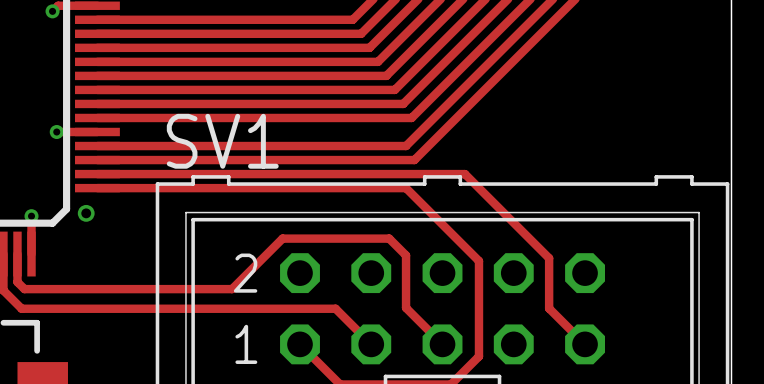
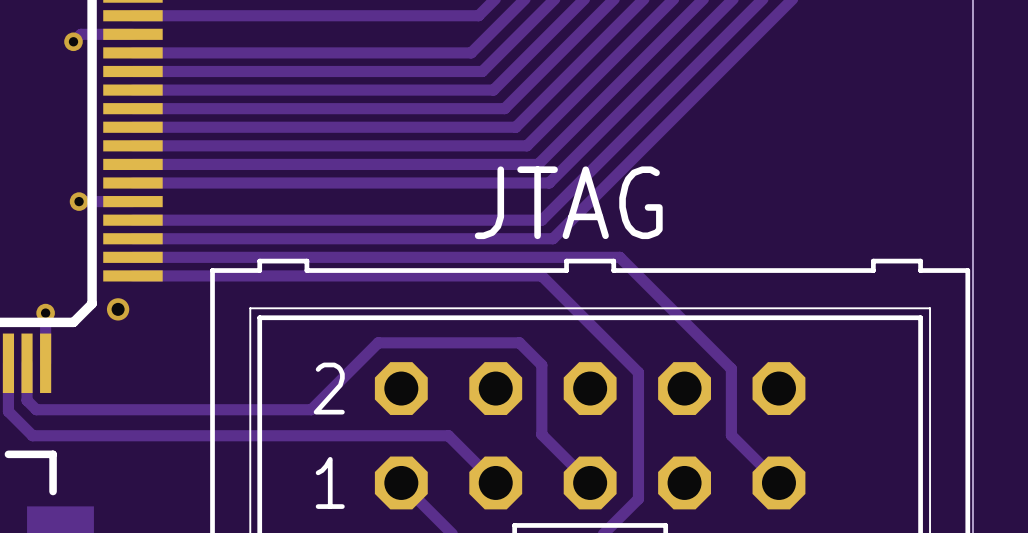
SV1 name: SV1 (222, 141) -> JTAG (568, 202)

